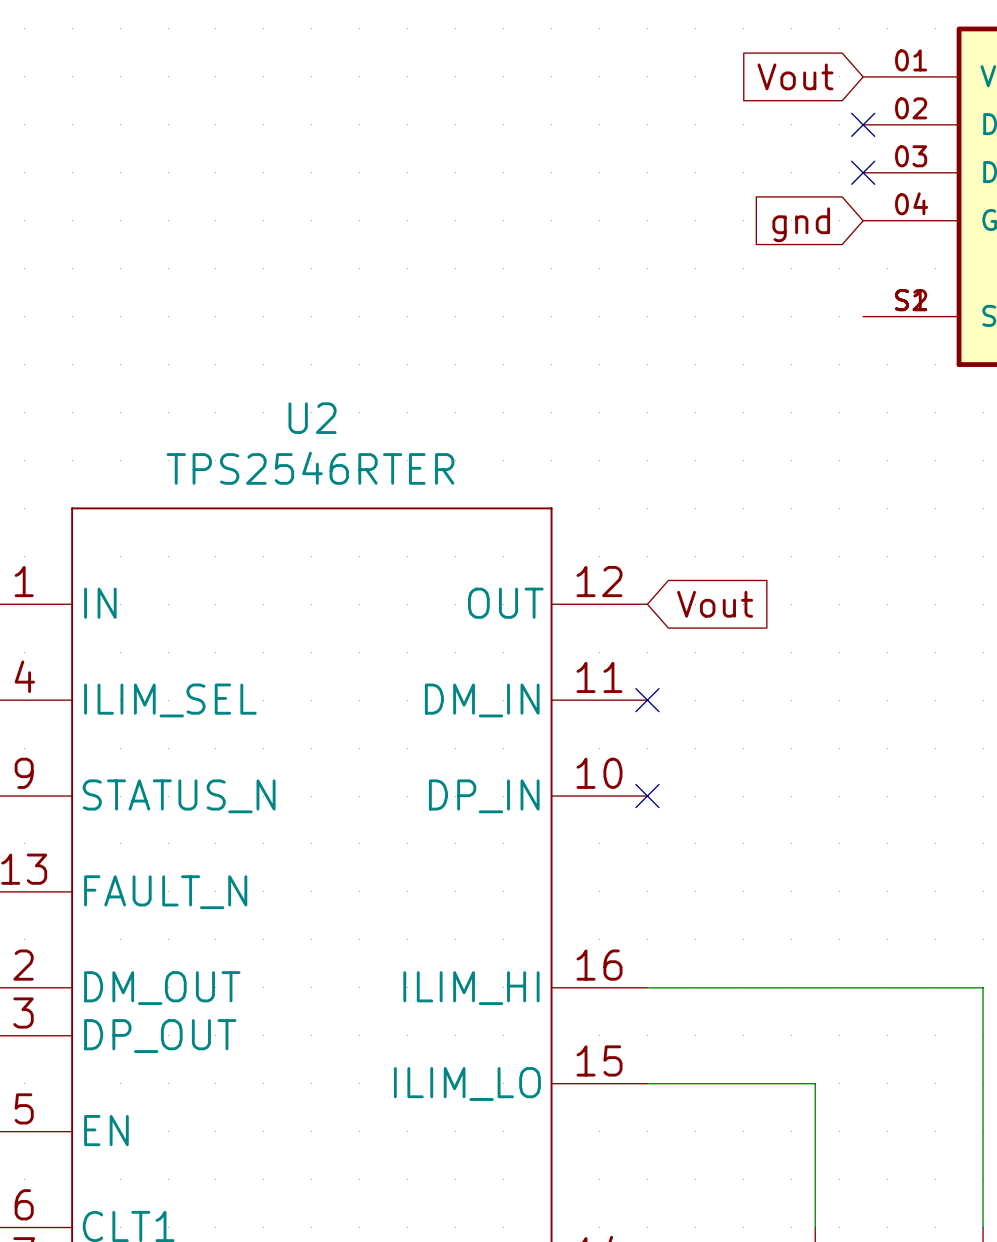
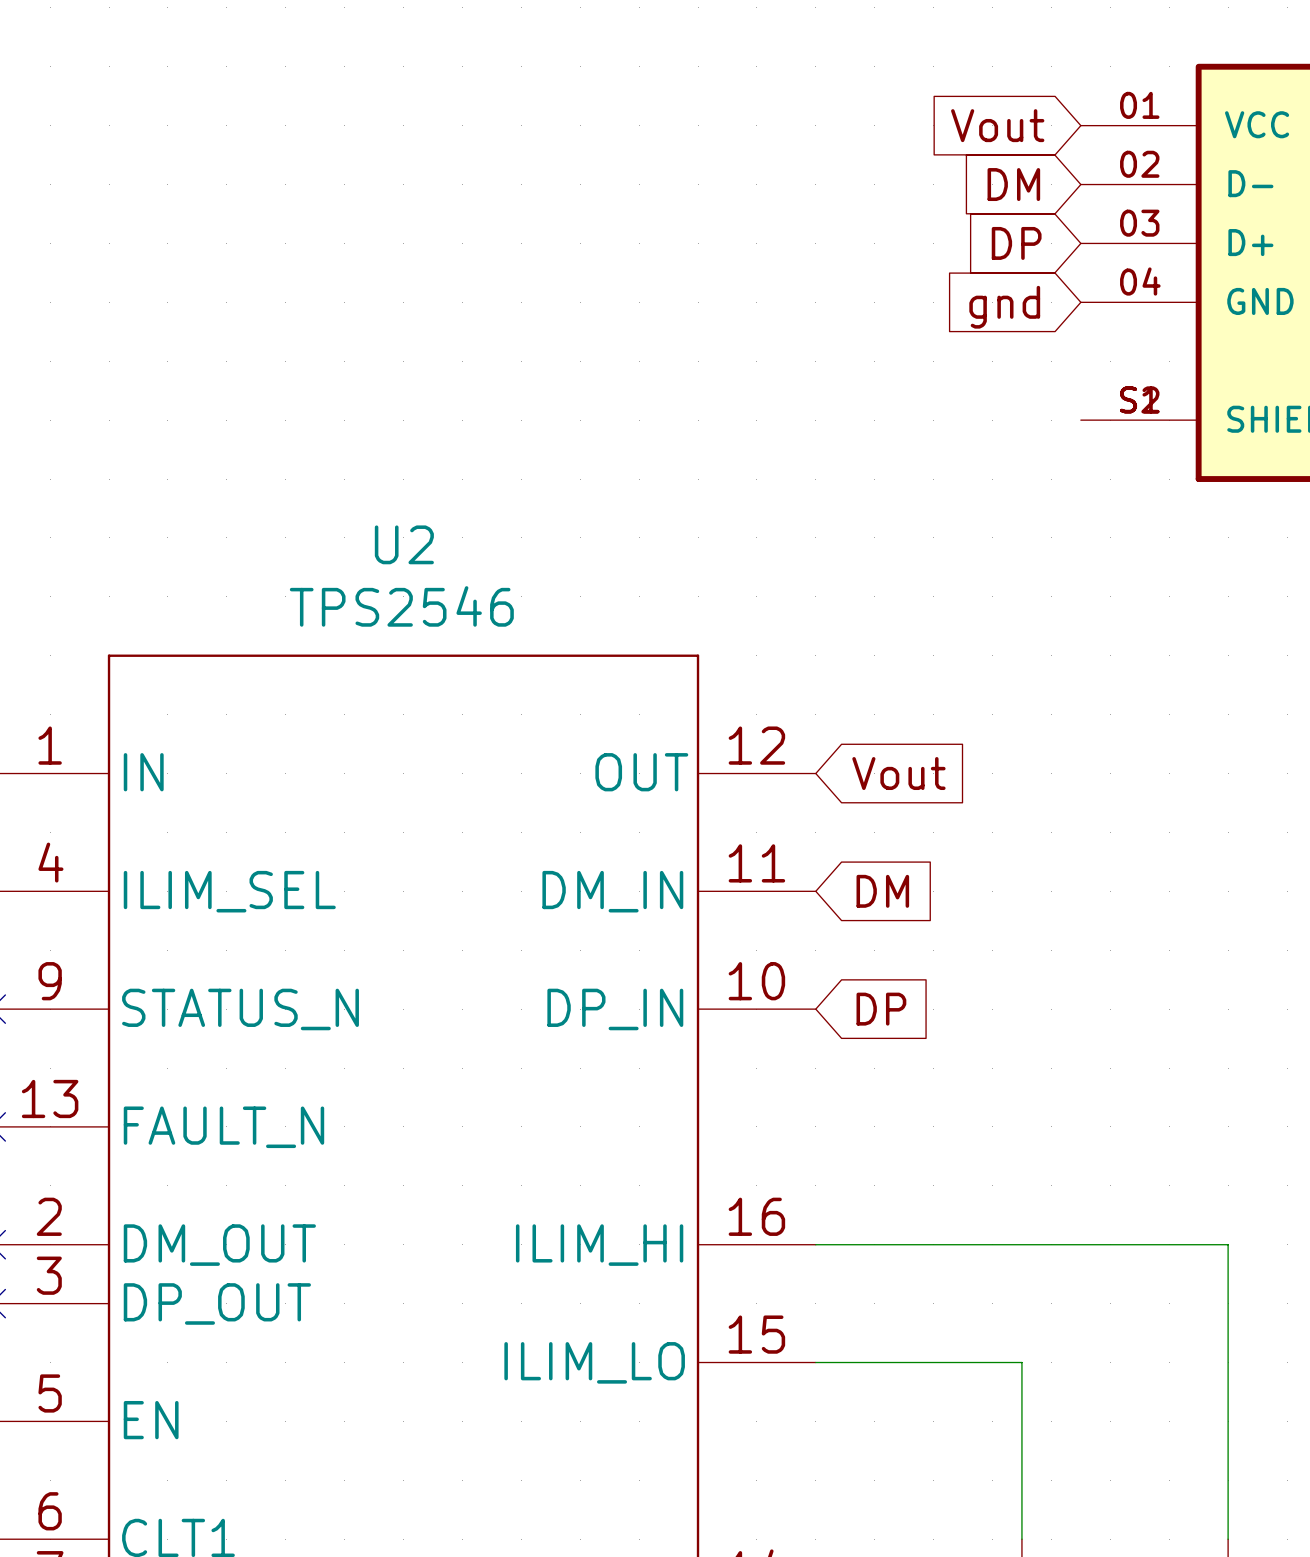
global label: none -> DM (1013, 184)
no-connect mark: (863, 124) -> none
global label: none -> DP (1016, 243)
no-connect mark: (863, 172) -> none
U2 value: TPS2546RTER (310, 468) -> TPS2546 (401, 606)
no-connect mark: (647, 700) -> none
global label: none -> DM (882, 891)
no-connect mark: (647, 796) -> none
global label: none -> DP (881, 1009)

